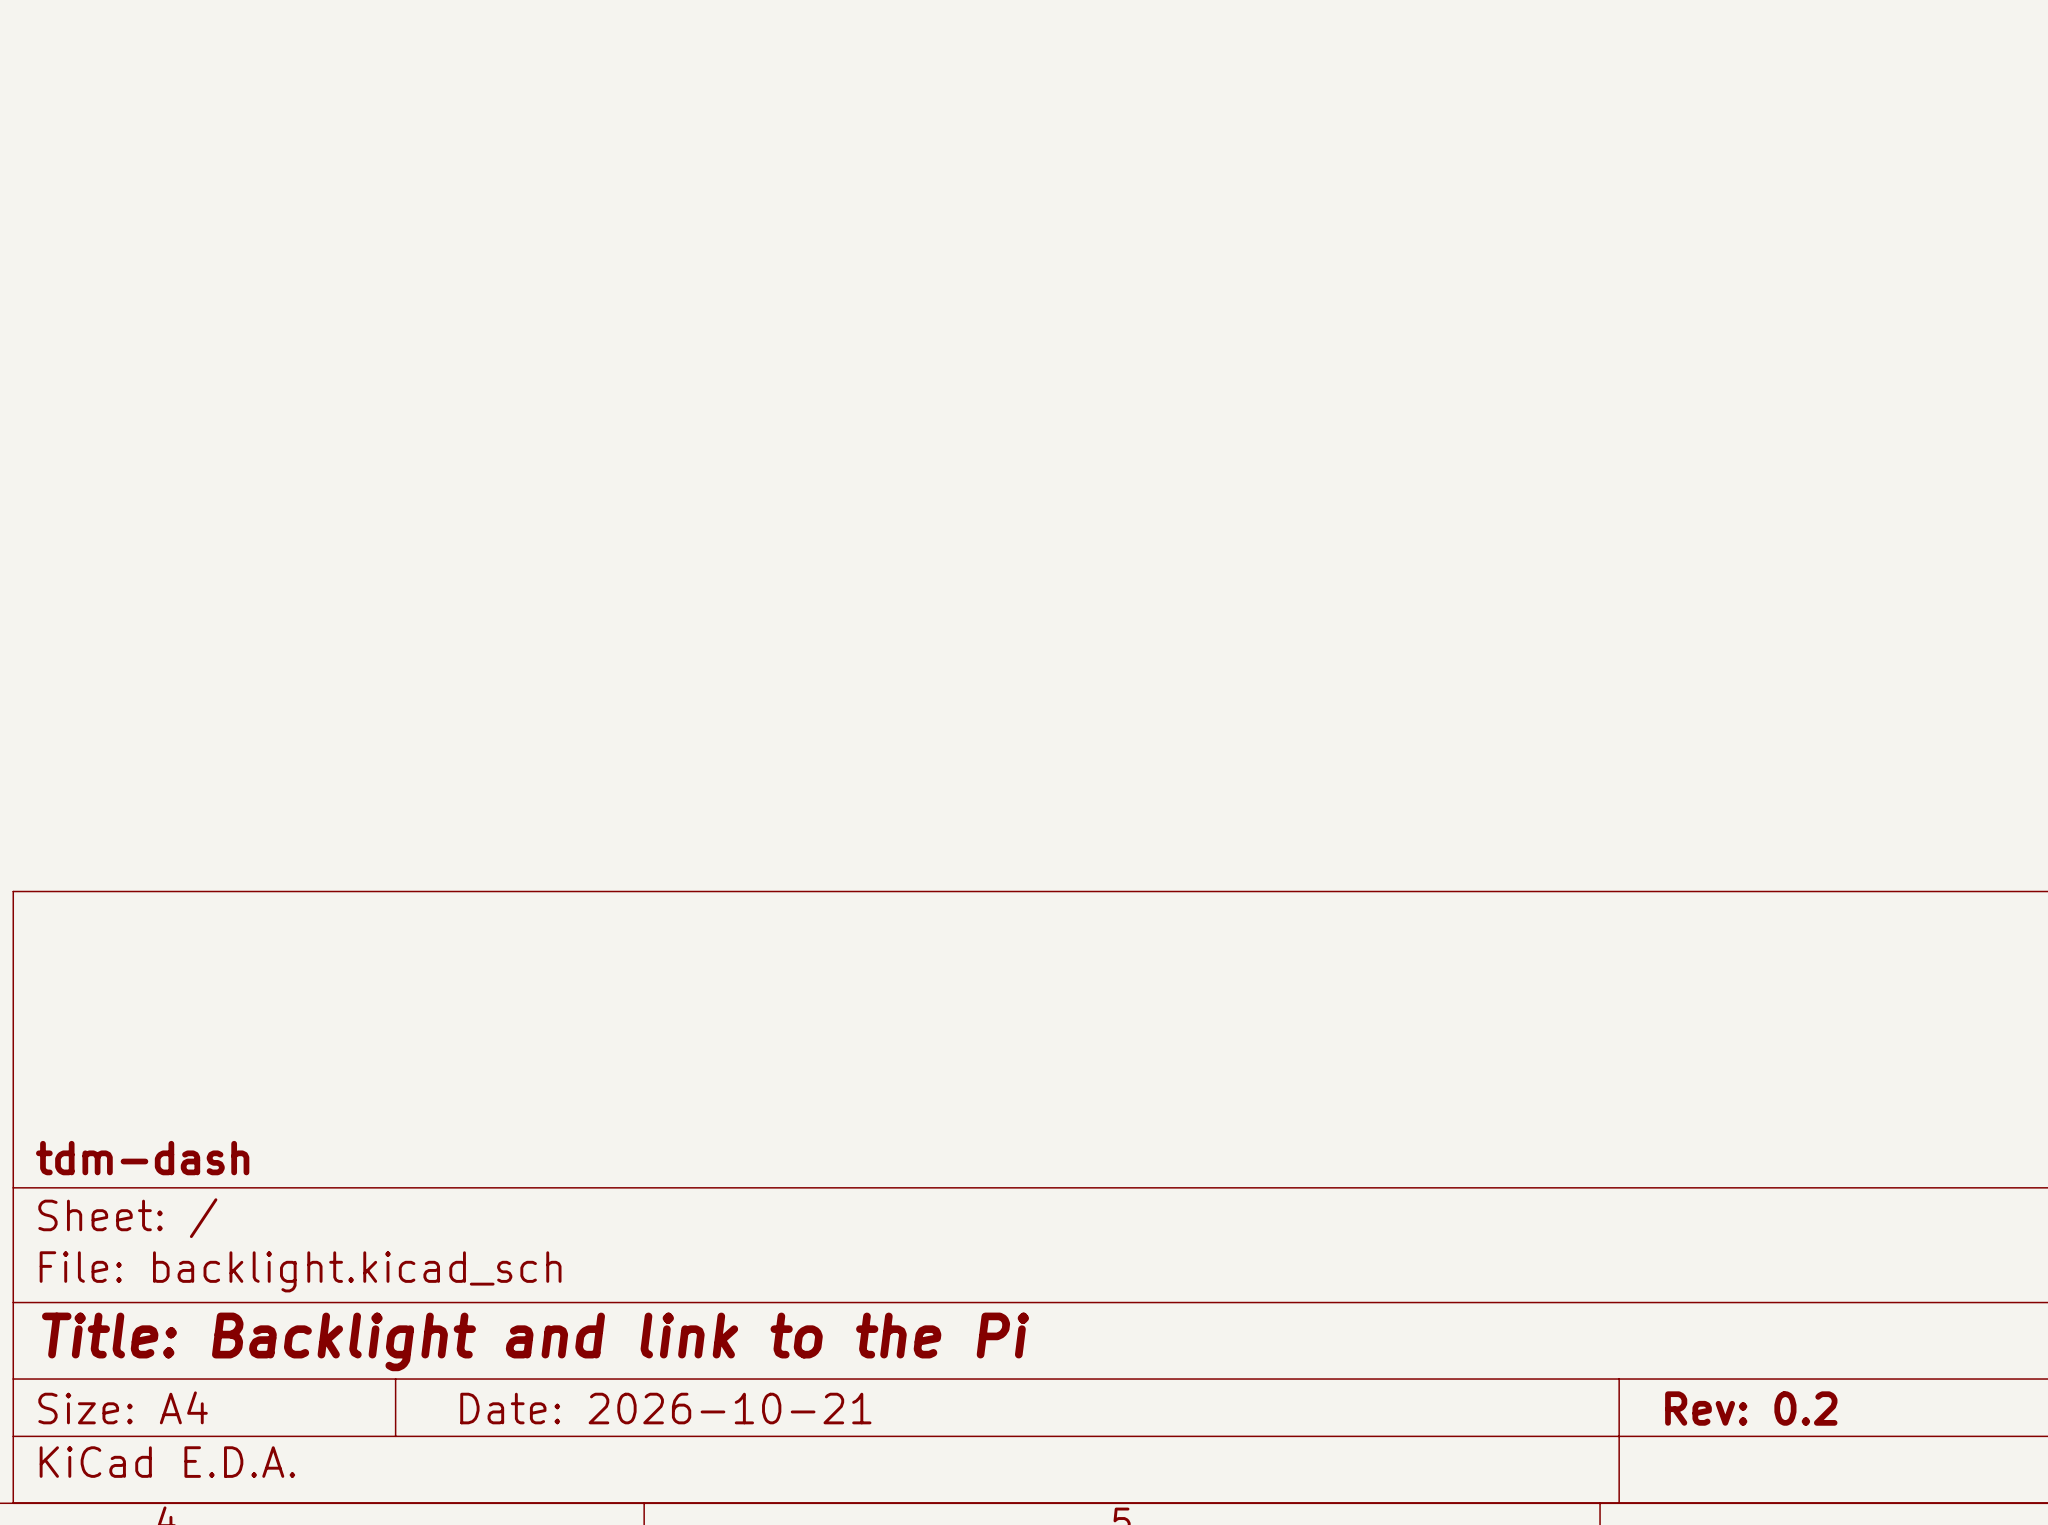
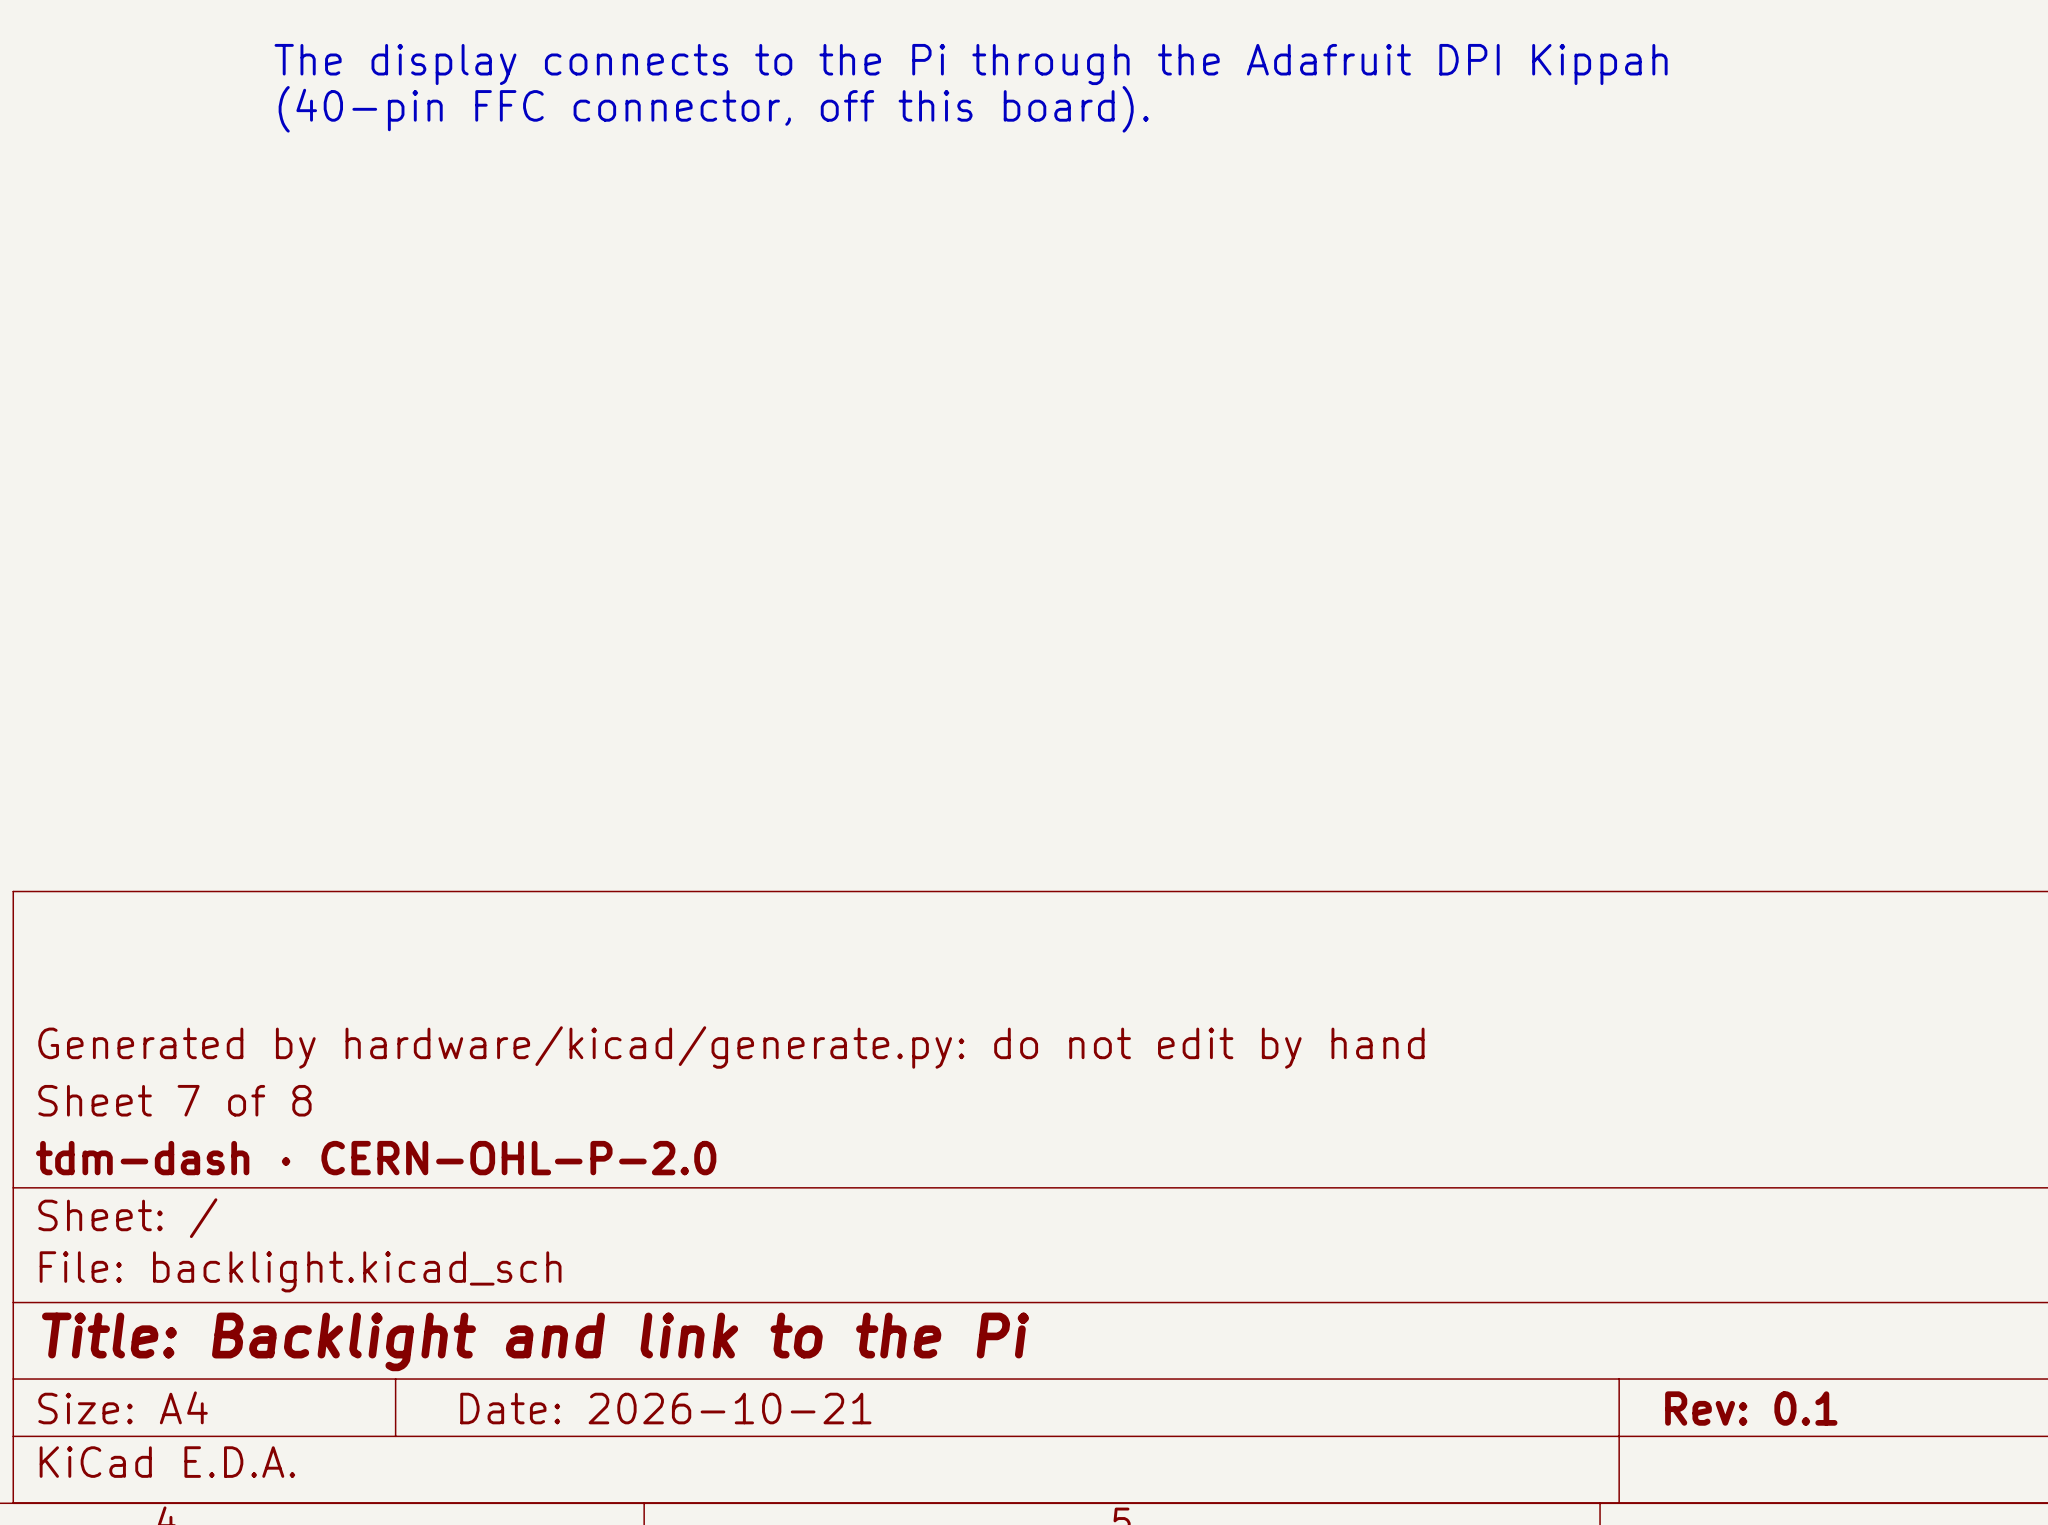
text: none -> The display connects to the Pi through the Adafruit DPI Kippah (971, 64)
text: none -> (40-pin FFC connector, off this board). (713, 109)
title block: none -> Generated by hardware/kicad/generate.py: do not edit by hand (731, 1047)
title block: none -> Sheet 7 of 8 (174, 1100)
title block: tdm-dash (142, 1158) -> tdm-dash · CERN-OHL-P-2.0 (376, 1158)
title block: Rev: 0.2 (1751, 1408) -> Rev: 0.1 (1751, 1408)

